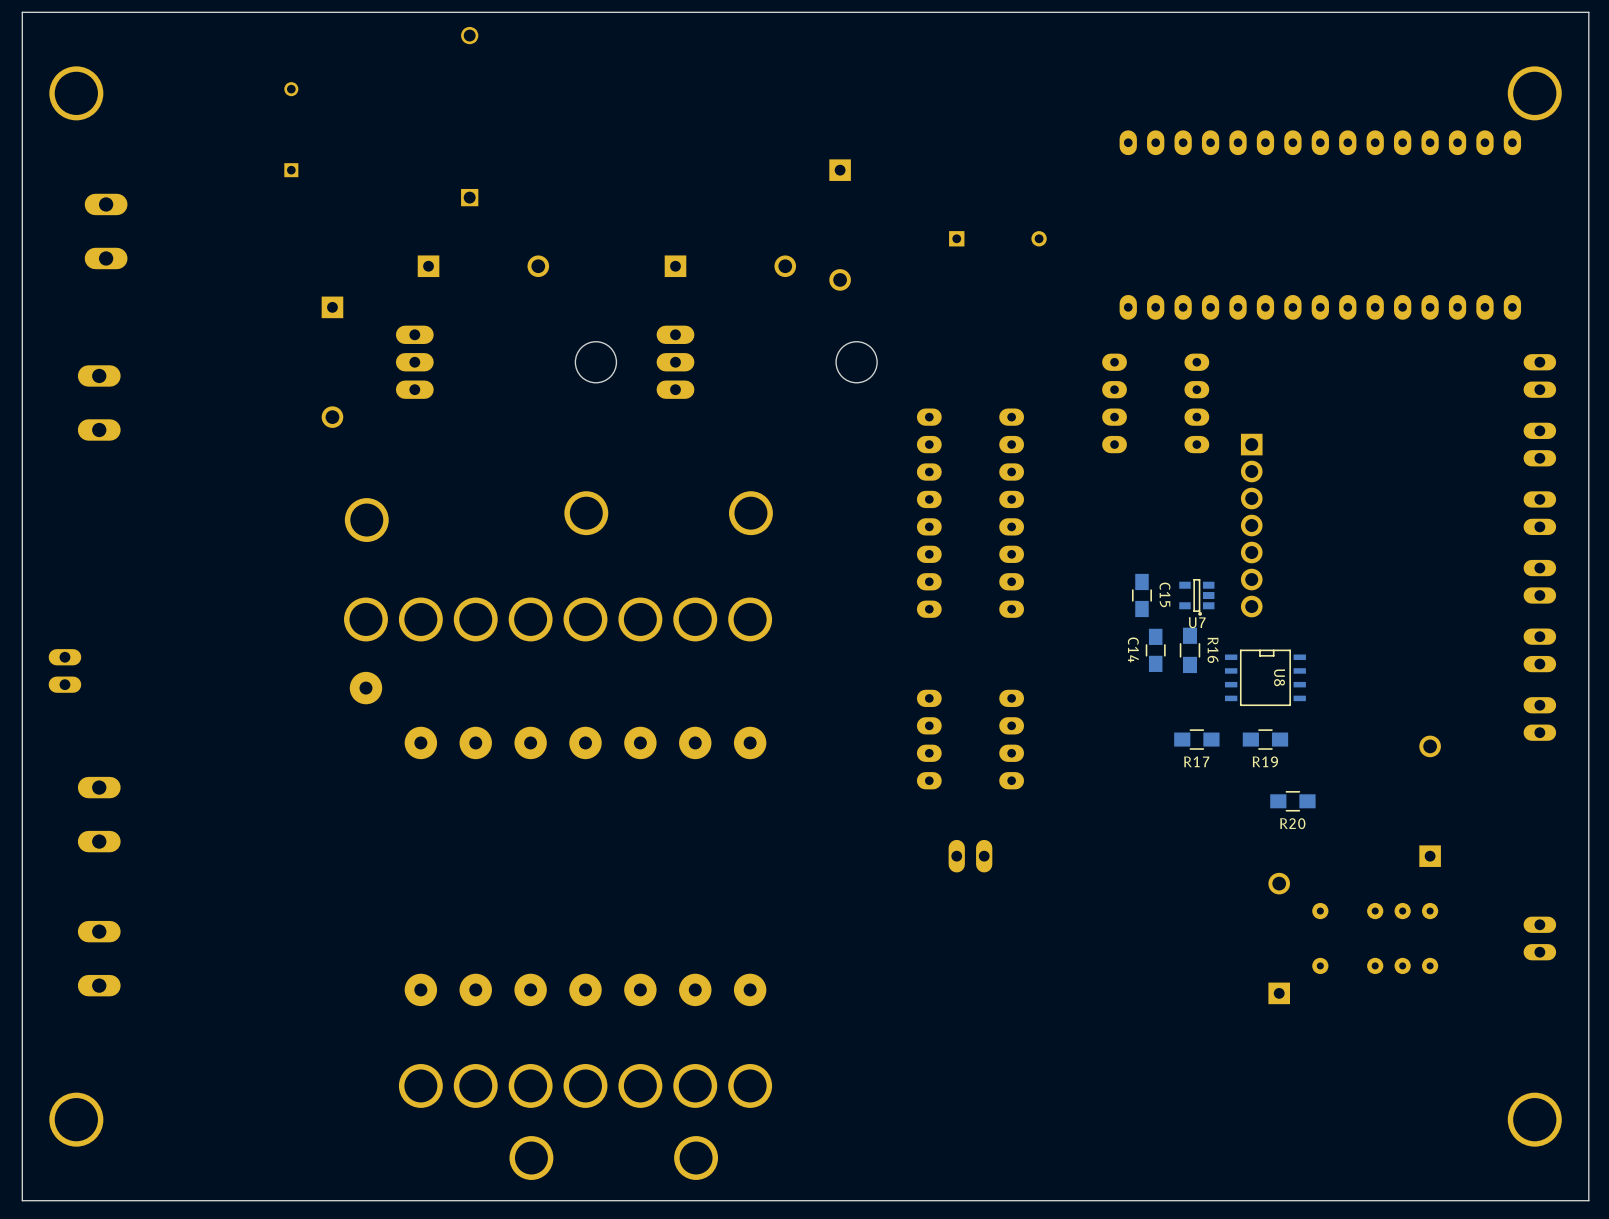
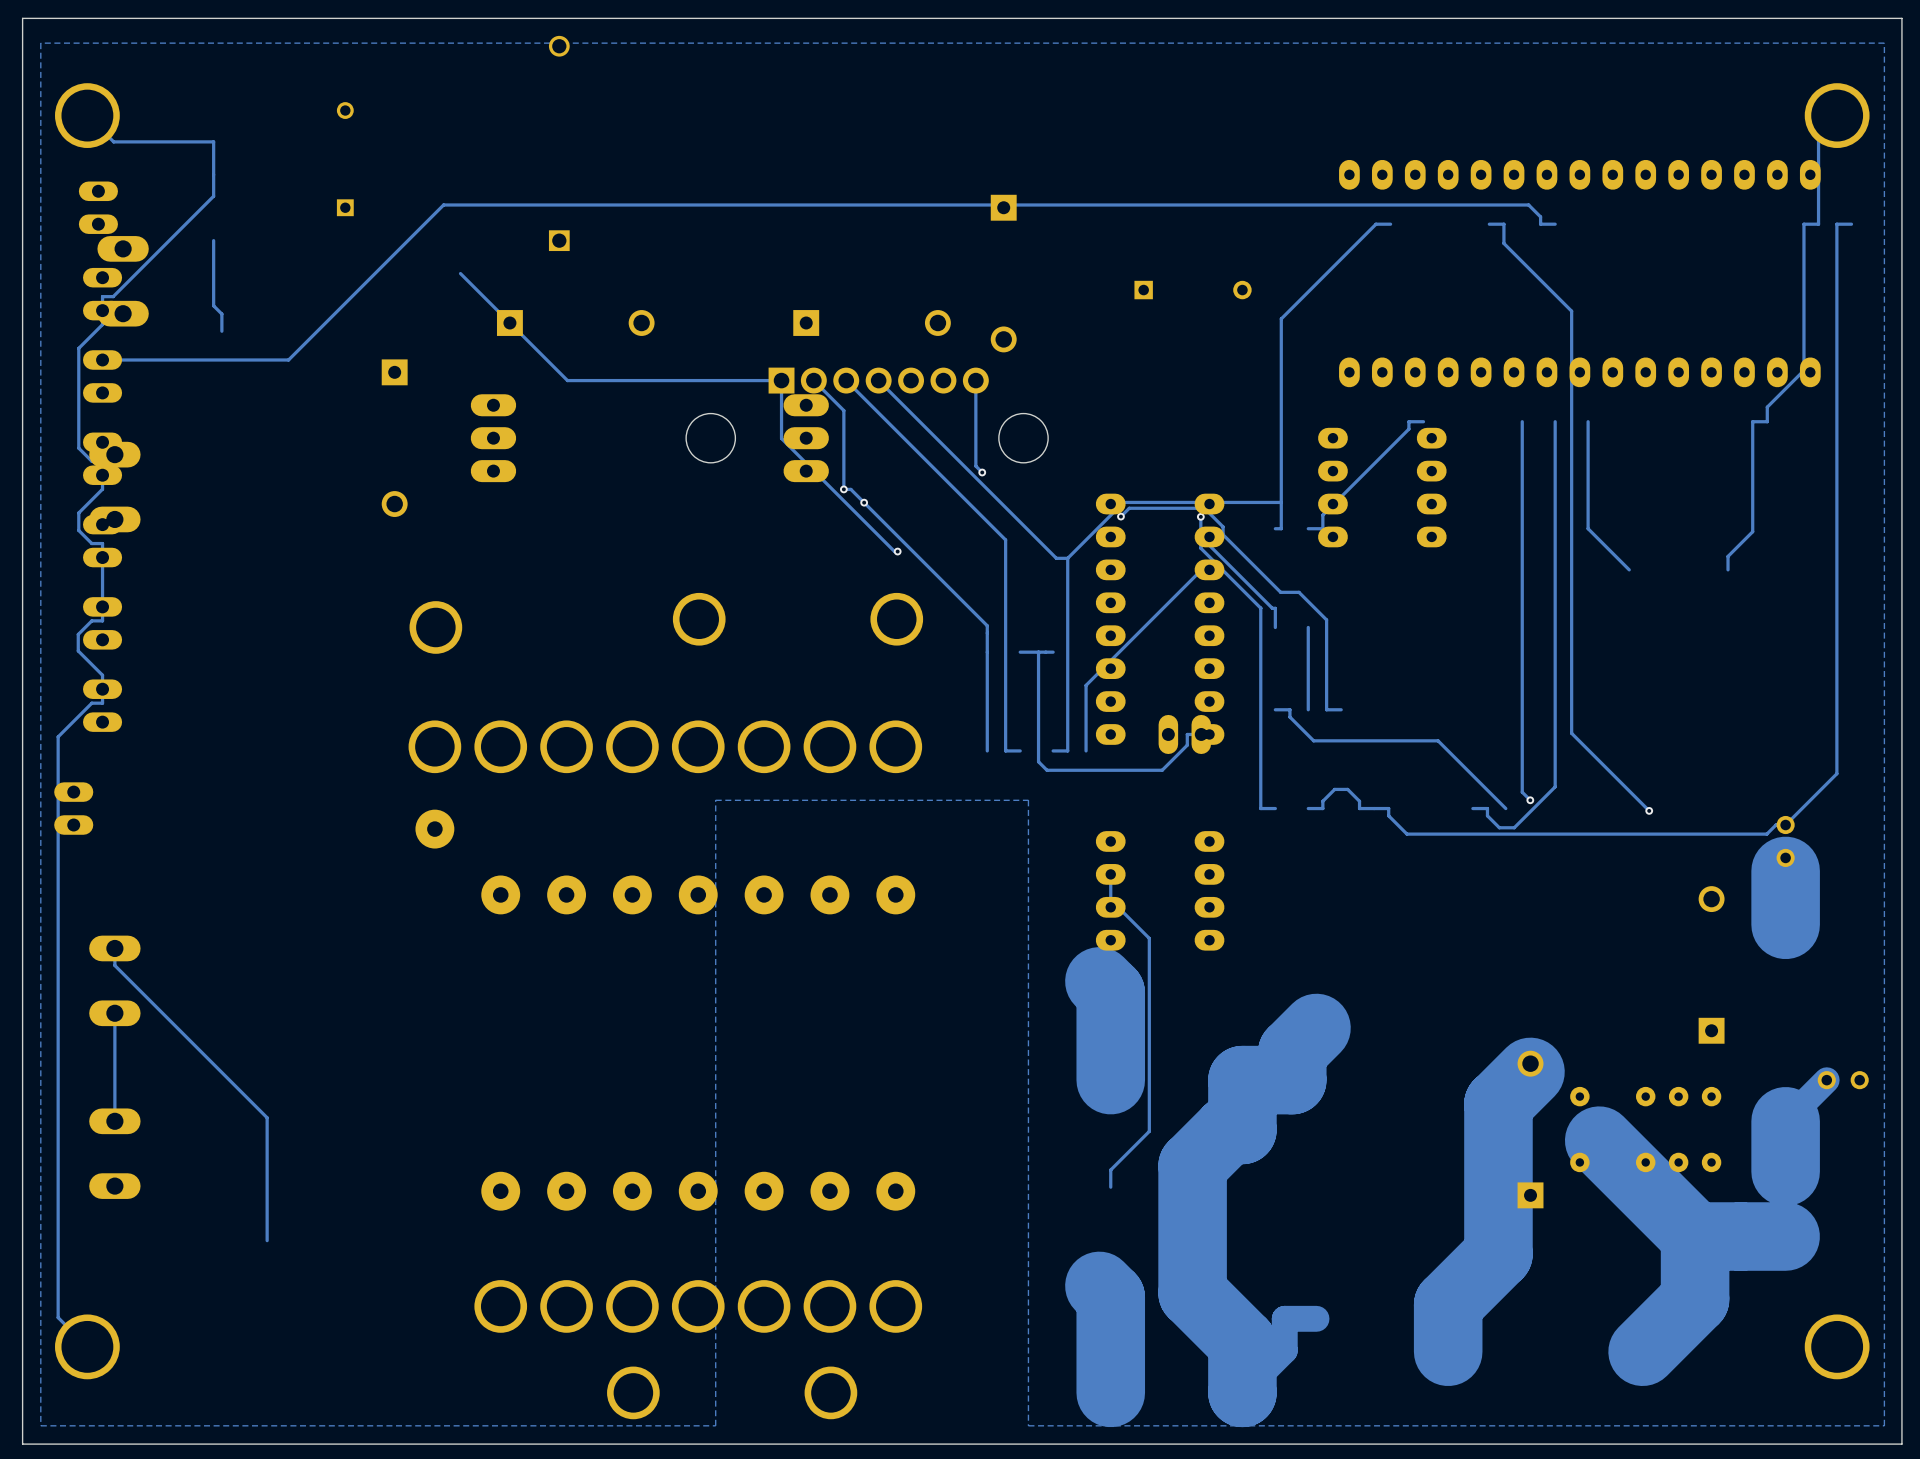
zone outline: none -> (1884, 43) (1884, 1425) (1028, 1425) (1028, 800) (715, 800) (715, 1425) (40, 1425) (40, 43) (1884, 43)
track: none -> (87, 115) (113, 141) (213, 141) (213, 196) (113, 296) (102, 296) (102, 324) (78, 348) (78, 448) (91, 461) (102, 461) (102, 489) (78, 512) (78, 530) (91, 543) (102, 543) (102, 620) (91, 620) (78, 634) (78, 650) (102, 675) (102, 703) (91, 703) (58, 736) (58, 1317) (87, 1346)
track: none -> (1837, 115) (1818, 134) (1818, 224) (1803, 224) (1803, 370) (1767, 407) (1767, 421) (1752, 421) (1752, 531) (1728, 556) (1728, 569)
part: none -> (98, 207)
track: none -> (1390, 224) (1375, 224) (1281, 318) (1281, 528) (1275, 528)
track: none -> (1489, 224) (1503, 224) (1503, 243) (1571, 311) (1571, 733) (1649, 810)
track: none -> (1555, 224) (1540, 224) (1540, 216) (1528, 204) (443, 204) (288, 360) (102, 360)
track: none -> (1851, 224) (1836, 224) (1836, 773) (1785, 825) (1775, 825) (1766, 834) (1406, 834) (1388, 815) (1388, 808) (1359, 808) (1359, 801) (1347, 789) (1334, 789) (1322, 801) (1322, 808) (1308, 808)
track: none -> (213, 240) (213, 305) (221, 314) (221, 331)
track: none -> (460, 273) (567, 380) (781, 380) (781, 438) (894, 551) (897, 551)
part: none -> (102, 294)
part: none -> (102, 376)
track: none -> (813, 380) (843, 410) (843, 489) (850, 489) (987, 625) (987, 750)
track: none -> (846, 380) (1005, 539) (1005, 750) (1020, 750)
track: none -> (878, 380) (1056, 558) (1067, 558)
part: none -> (878, 380)
track: none -> (975, 380) (975, 466) (982, 472)
track: none -> (1423, 421) (1408, 421) (1408, 429) (1322, 515) (1322, 528) (1308, 528)
track: none -> (1522, 421) (1522, 792) (1530, 800)
track: none -> (1555, 421) (1555, 786) (1514, 827) (1499, 827) (1487, 815) (1487, 808) (1472, 808)
track: none -> (1588, 421) (1588, 528) (1629, 569)
part: (1539, 375) -> none
part: none -> (102, 458)
via: none -> (982, 472)
via: none -> (843, 489)
via: none -> (864, 502)
track: none -> (1281, 502) (1123, 502) (1067, 558)
track: none -> (1120, 516) (1129, 508) (1204, 508) (1223, 526) (1223, 534) (1280, 592) (1299, 592) (1326, 619) (1326, 709) (1341, 709)
via: none -> (1120, 516)
track: none -> (1200, 516) (1200, 548) (1260, 608) (1260, 808) (1275, 808)
via: none -> (1200, 516)
part: (1539, 444) -> none
part: none -> (102, 541)
track: none -> (1208, 544) (1272, 608) (1275, 608) (1275, 627)
via: none -> (897, 551)
track: none -> (1067, 558) (1067, 750) (1053, 750)
track: none -> (1206, 565) (1086, 685) (1086, 750)
part: (1539, 513) -> none
part: none -> (102, 623)
track: none -> (1308, 627) (1308, 709)
part: (1251, 525) -> none
track: none -> (1038, 652) (1038, 761) (1047, 770) (1162, 770) (1187, 745) (1187, 734) (1201, 734)
track: none -> (1053, 652) (1020, 652)
part: (1539, 581) -> none
part: none -> (102, 705)
track: none -> (1275, 709) (1289, 709) (1289, 717) (1313, 740) (1438, 740) (1505, 808)
C15: (1141, 595) -> none
U7: (1196, 597) -> none
C14: (1155, 650) -> none
R16: (1189, 650) -> none
part: (1539, 650) -> none
via: none -> (1530, 800)
via: none -> (1649, 810)
U8: (1265, 677) -> none
part: none -> (1785, 841)
track: none -> (1785, 857) (1785, 924)
part: (1539, 718) -> none
track: none -> (1110, 882) (1110, 899) (1149, 938) (1149, 1131) (1110, 1170) (1110, 1187)
R17: (1196, 739) -> none
R19: (1265, 739) -> none
track: none -> (114, 948) (114, 965) (267, 1117) (267, 1240)
R20: (1292, 801) -> none
track: none -> (1099, 981) (1110, 992) (1110, 1080)
track: none -> (114, 1013) (114, 1121)
track: none -> (1316, 1014) (1316, 1027) (1292, 1052) (1292, 1080) (1242, 1080) (1242, 1129) (1228, 1129) (1192, 1165) (1192, 1293) (1242, 1343) (1242, 1392)
part position: (970, 856) -> (1184, 734)
track: none -> (1530, 1071) (1498, 1103) (1498, 1254) (1448, 1304) (1448, 1351)
track: none -> (1826, 1080) (1785, 1121) (1785, 1171)
part: none -> (1843, 1080)
part: (1539, 938) -> none
track: none -> (1599, 1140) (1695, 1236)
track: none -> (1695, 1236) (1695, 1299) (1642, 1351)
track: none -> (1785, 1236) (1695, 1236)
track: none -> (1099, 1285) (1110, 1297) (1110, 1392)
track: none -> (1316, 1318) (1284, 1318) (1284, 1350) (1242, 1392)

